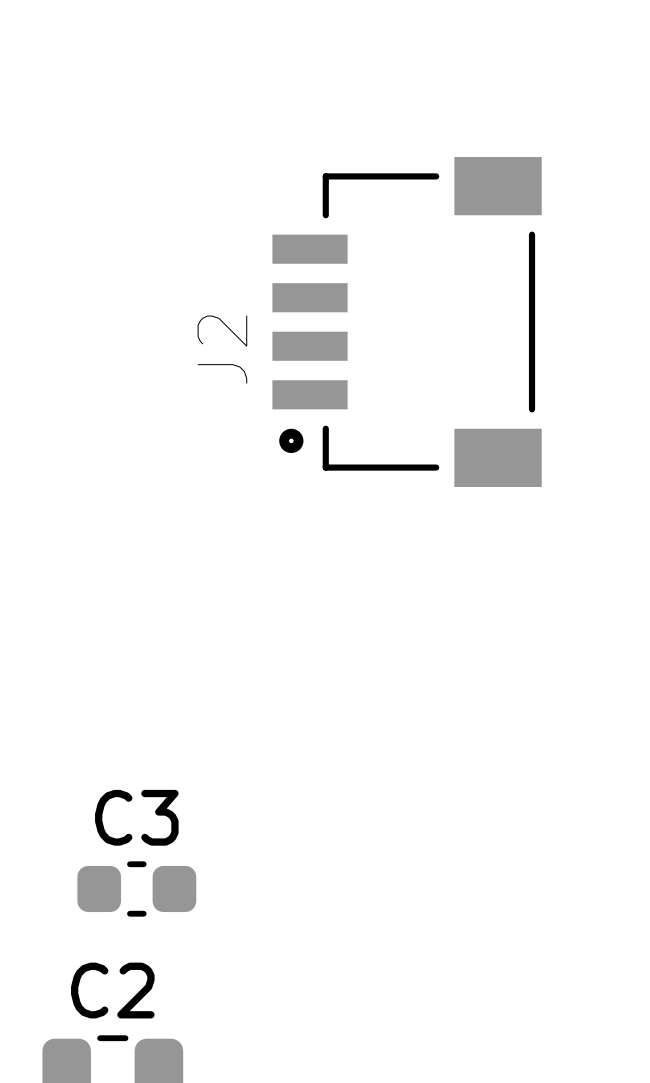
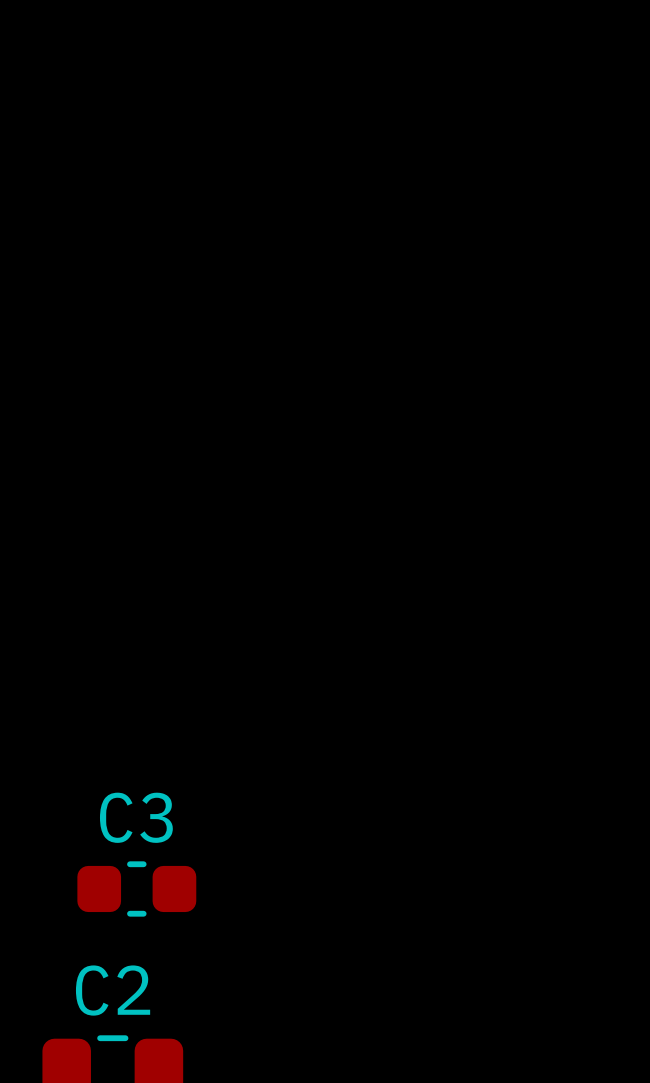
J2: (407, 322) -> none

